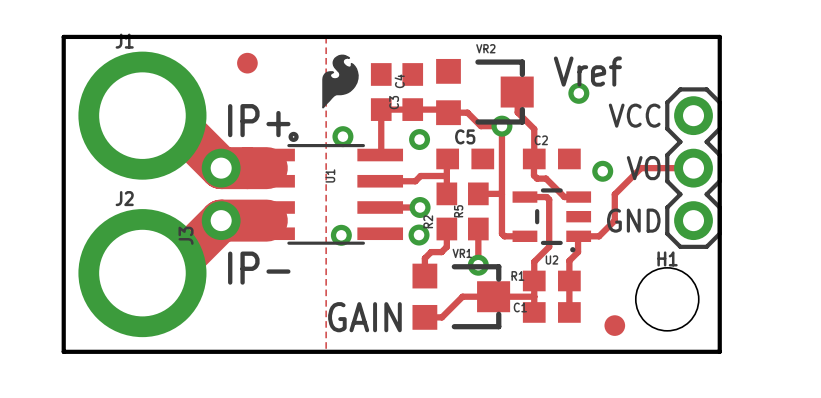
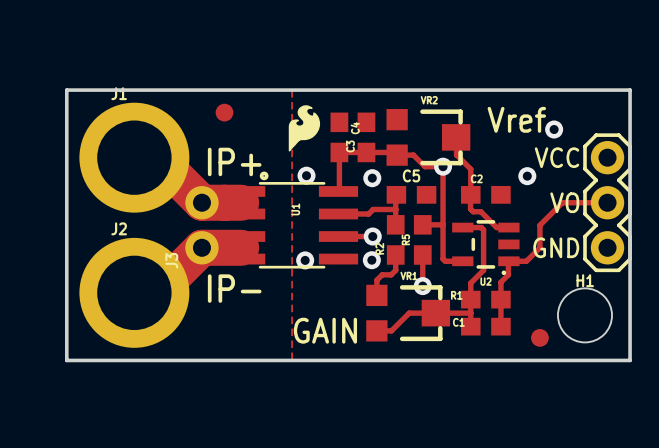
via: none -> (554, 129)
via: (578, 93) -> none
via: none -> (527, 176)
via: (602, 171) -> none

